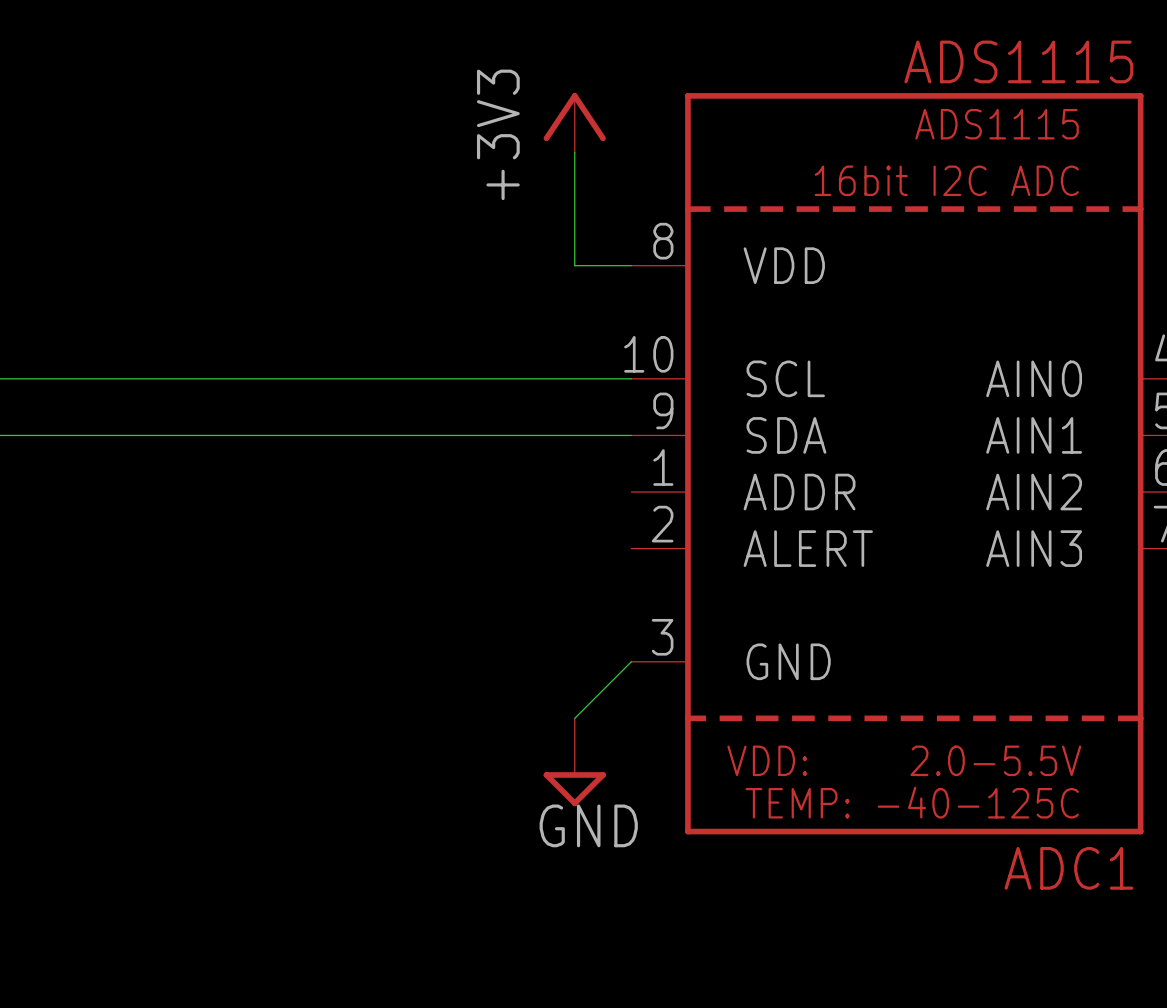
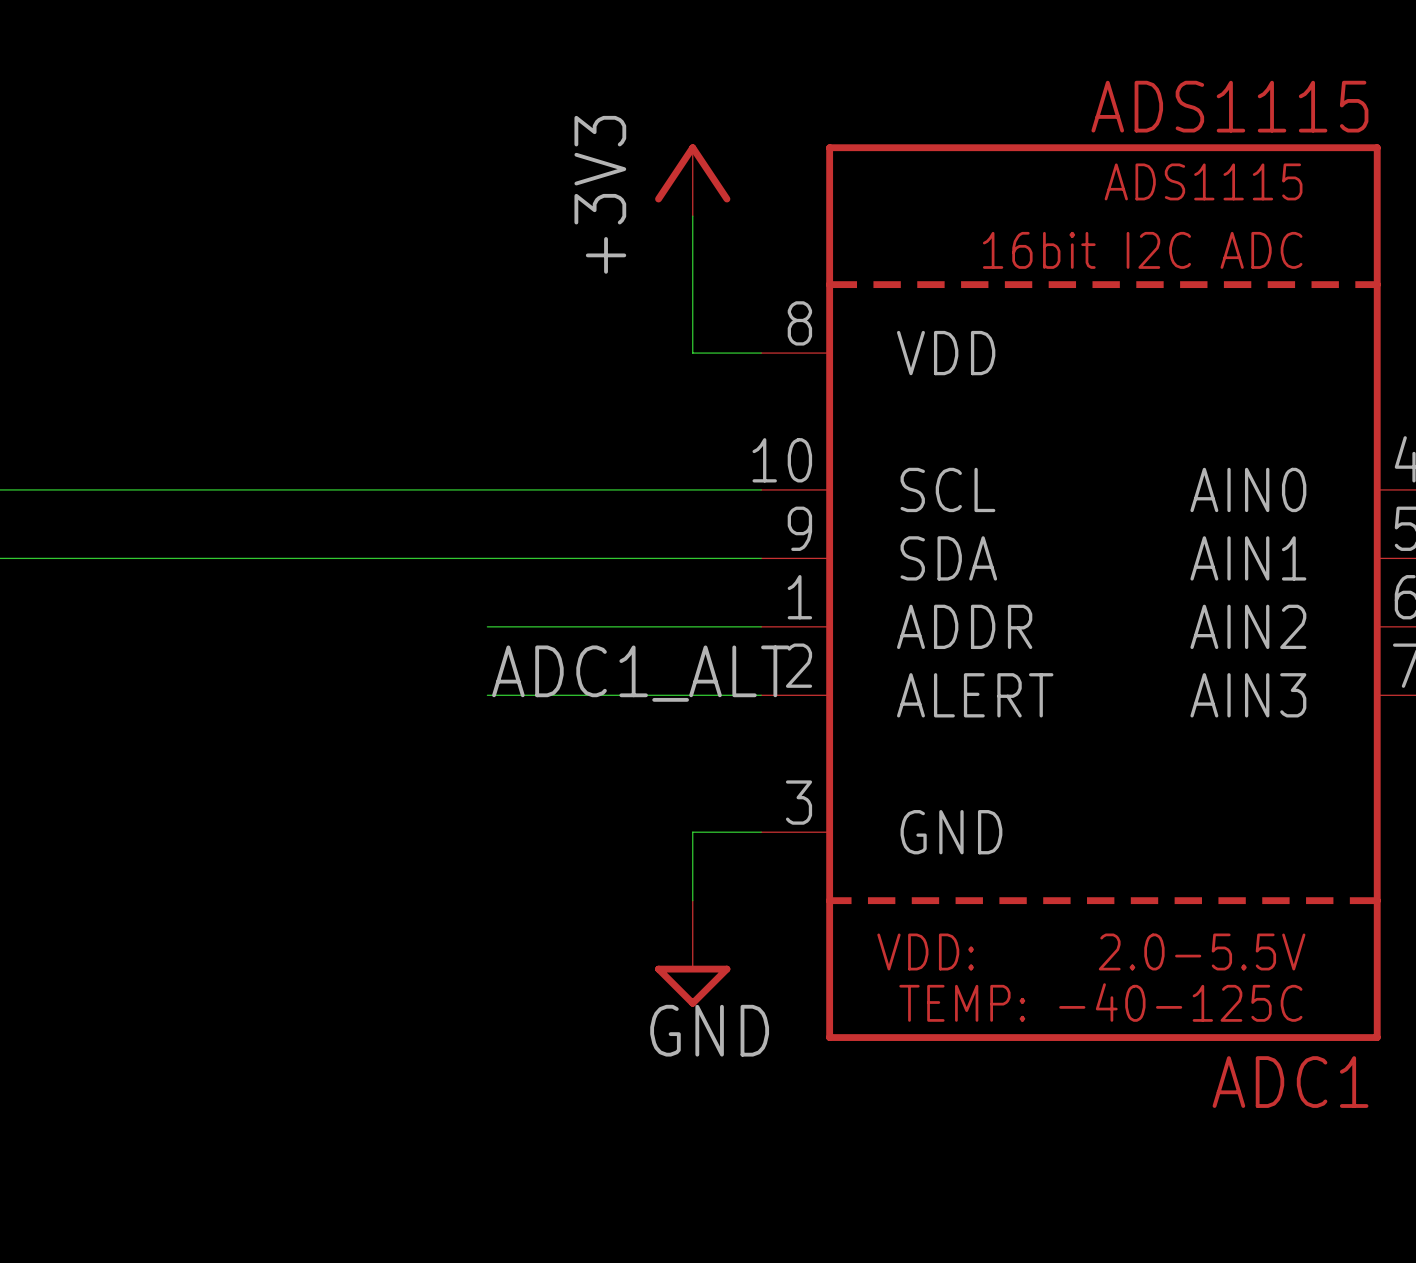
wire: none -> (487, 626) (761, 626)
label: none -> ADC1_ALT (640, 673)
wire: none -> (487, 695) (761, 695)
wire: (631, 661) (574, 718) -> (761, 832) (692, 832) (692, 900)

